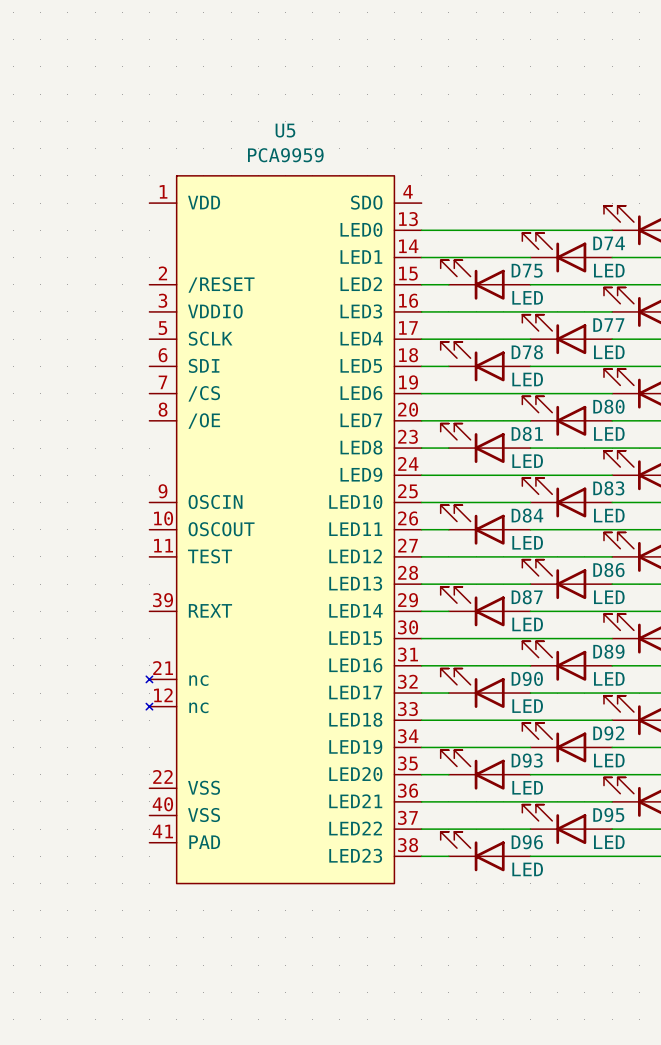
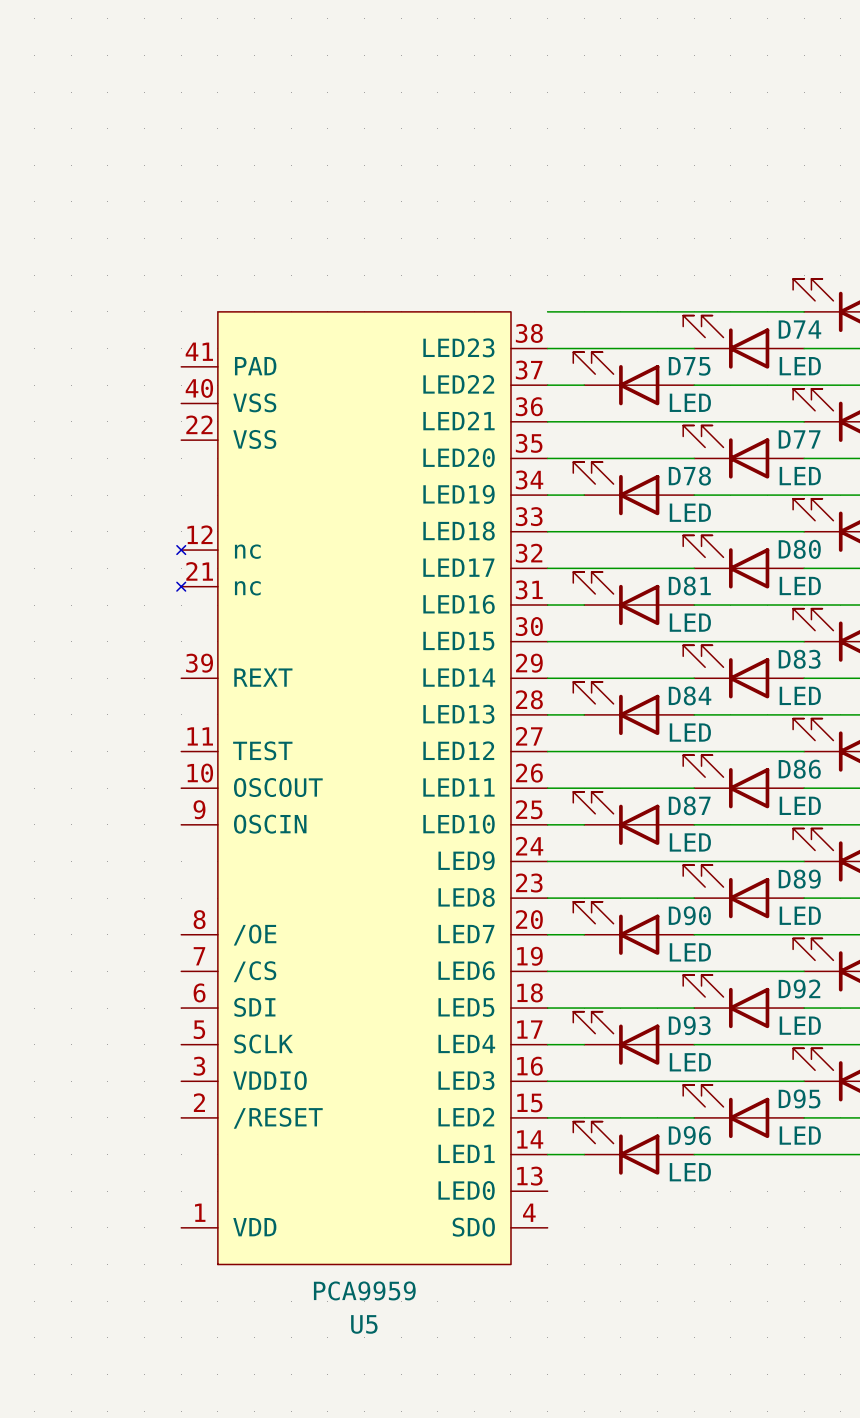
U5 flip: as is (270, 529) -> up-down (343, 788)

